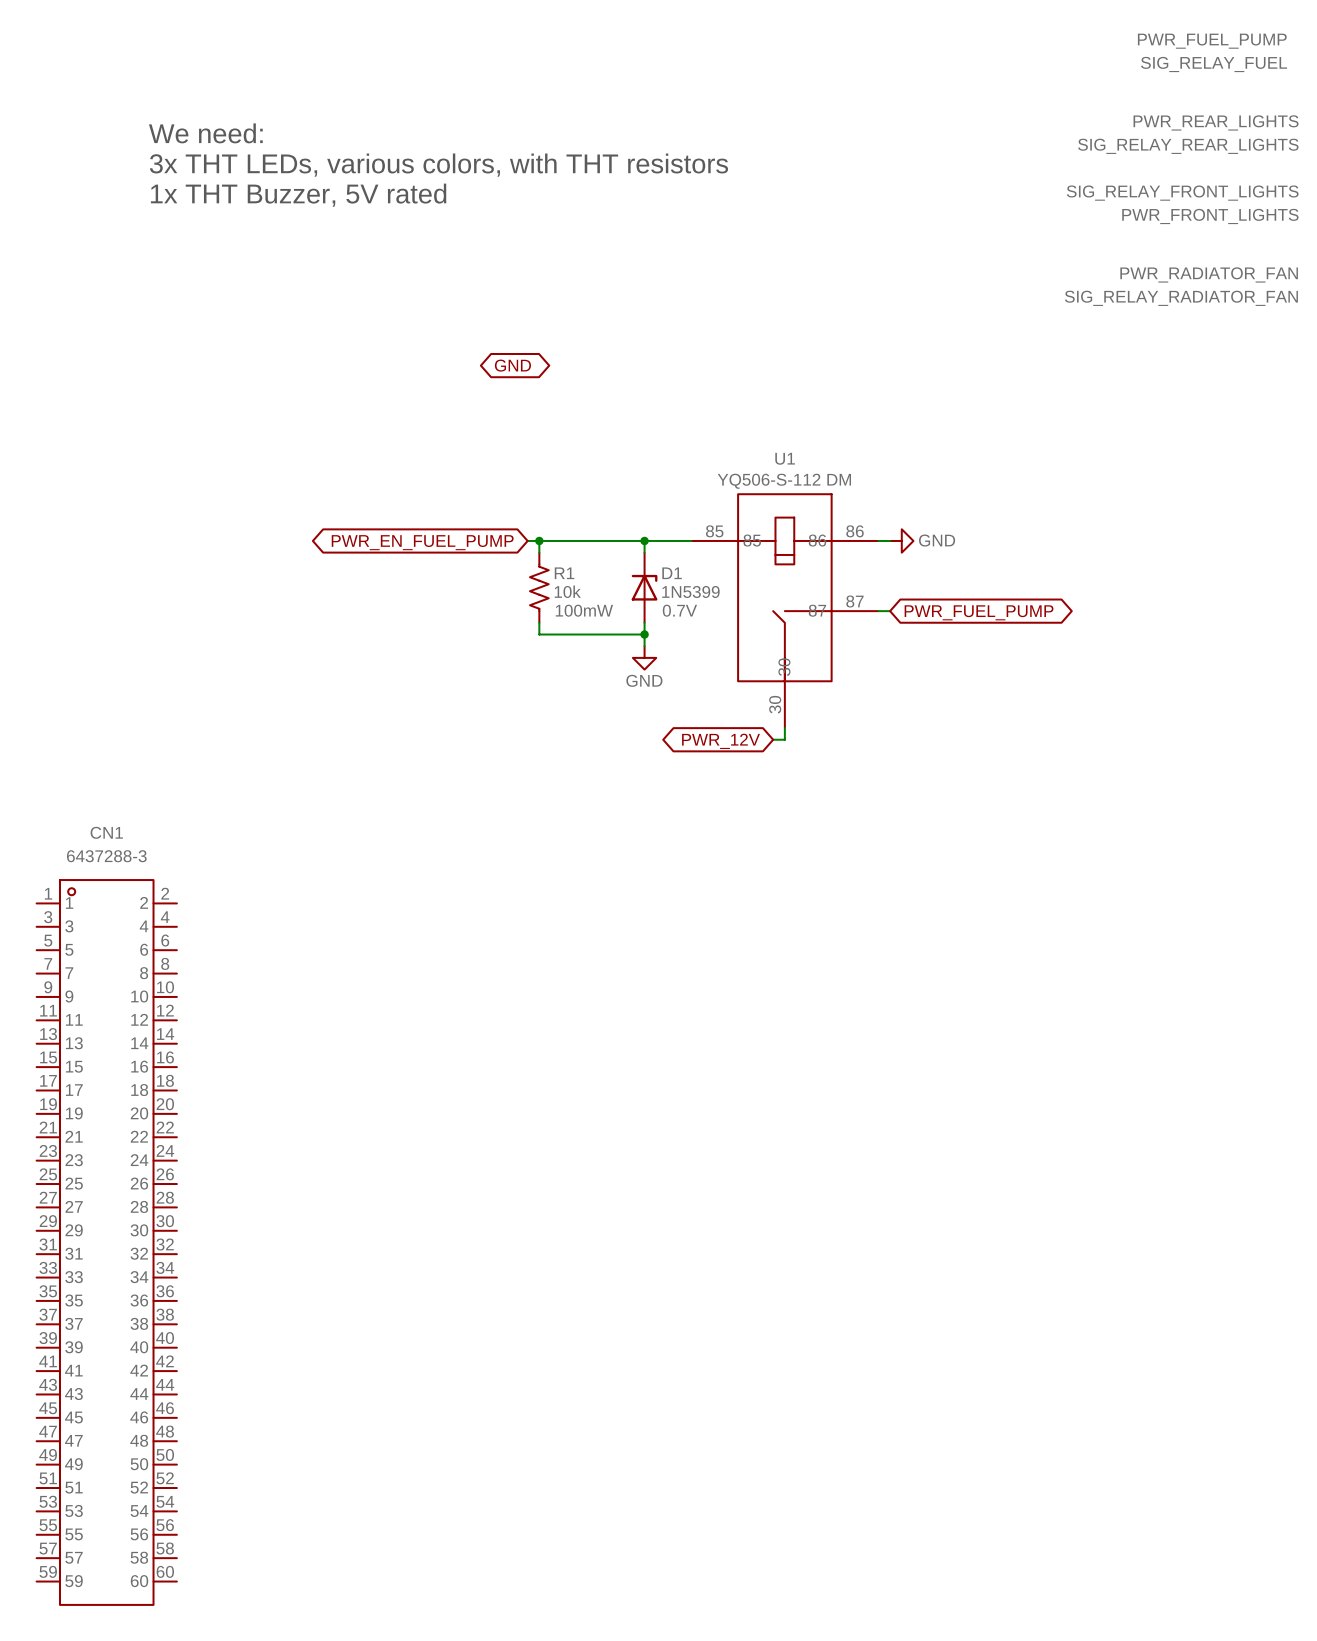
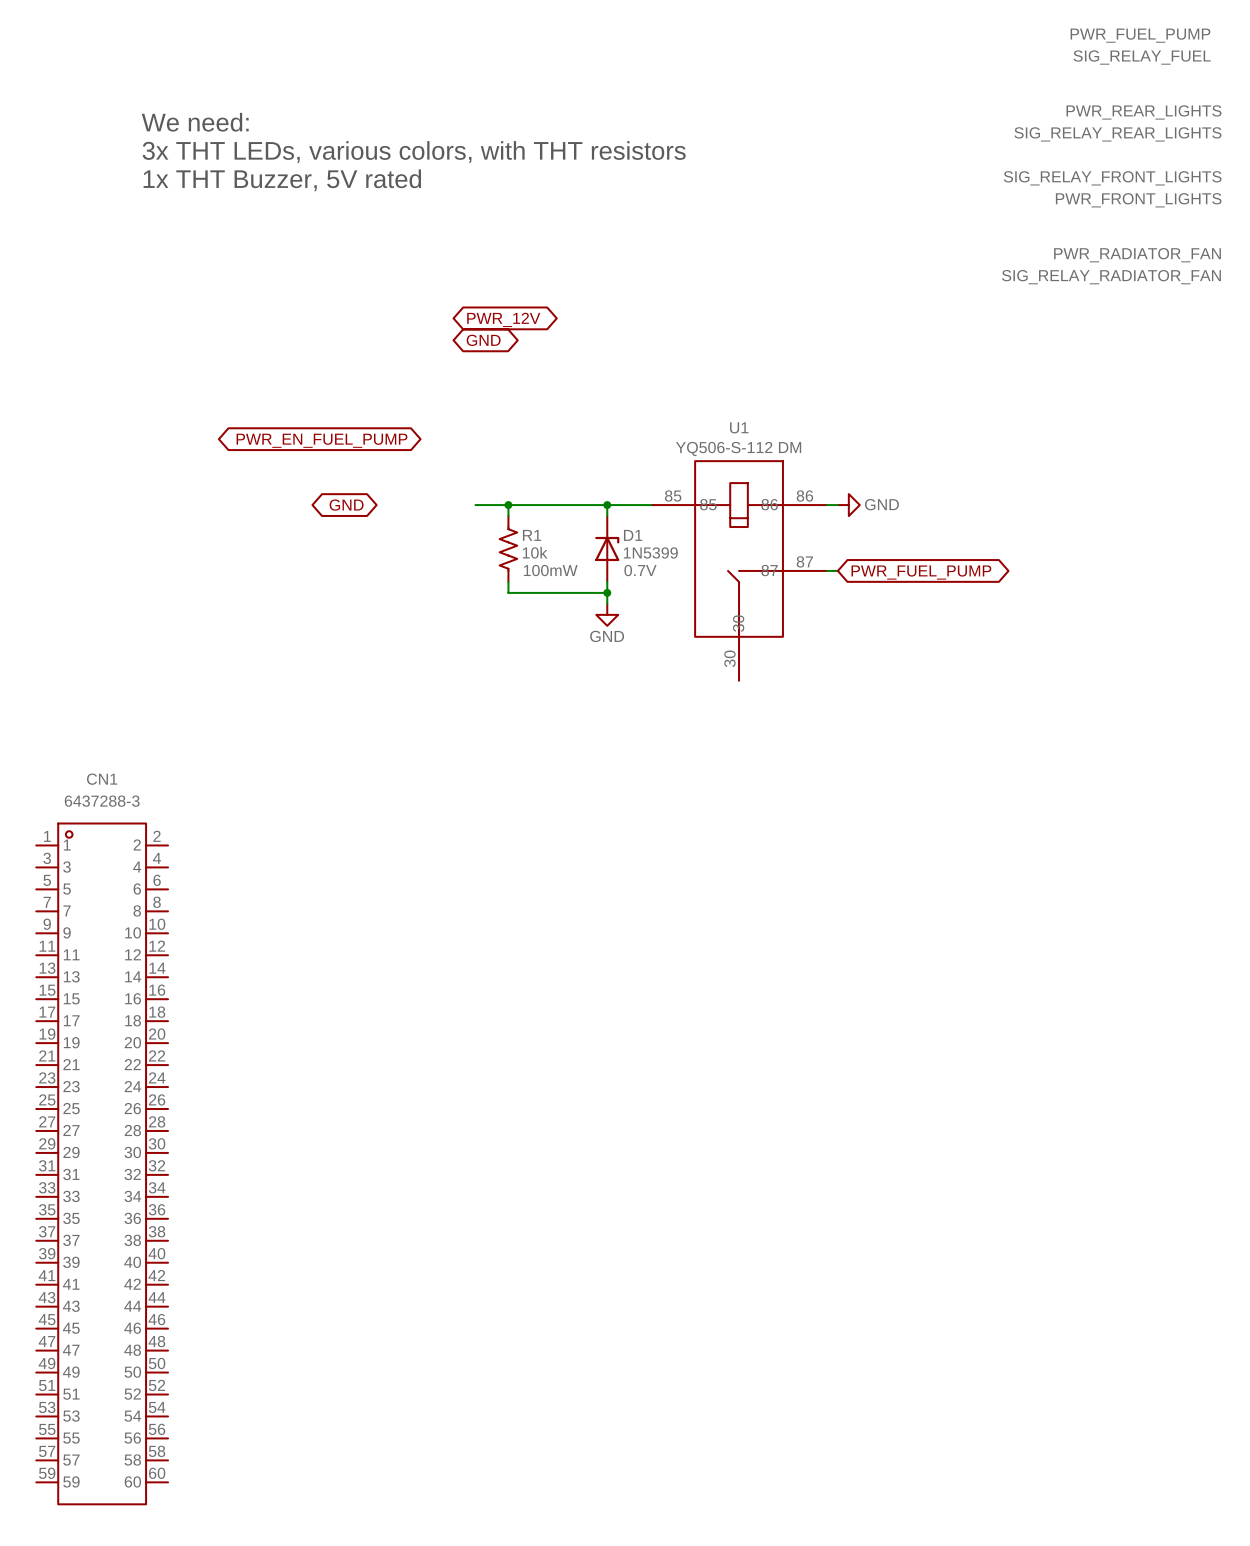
global label: none -> PWR_12V (503, 319)
global label: none -> GND (346, 505)
wire: none -> (475, 505) (497, 505)
global label position: PWR_EN_FUEL_PUMP (422, 542) -> PWR_EN_FUEL_PUMP (321, 440)
wire: (784, 728) (784, 739) (773, 739) -> none
global label: PWR_12V (721, 741) -> none

